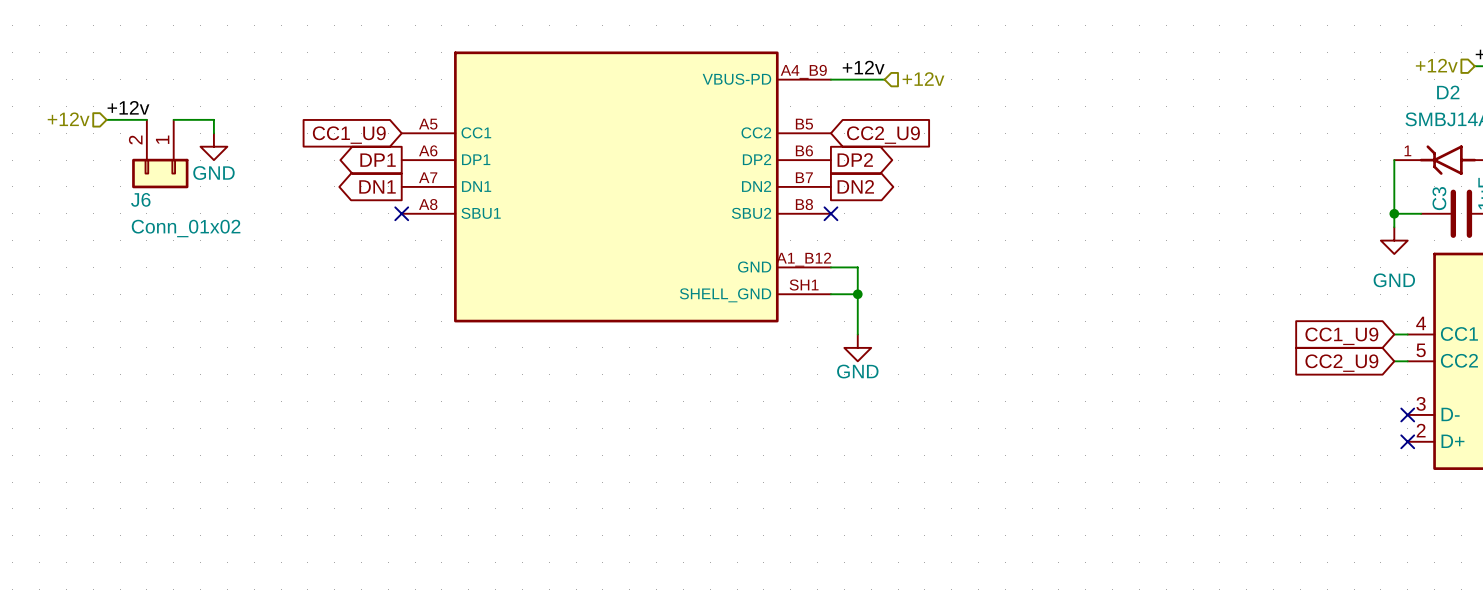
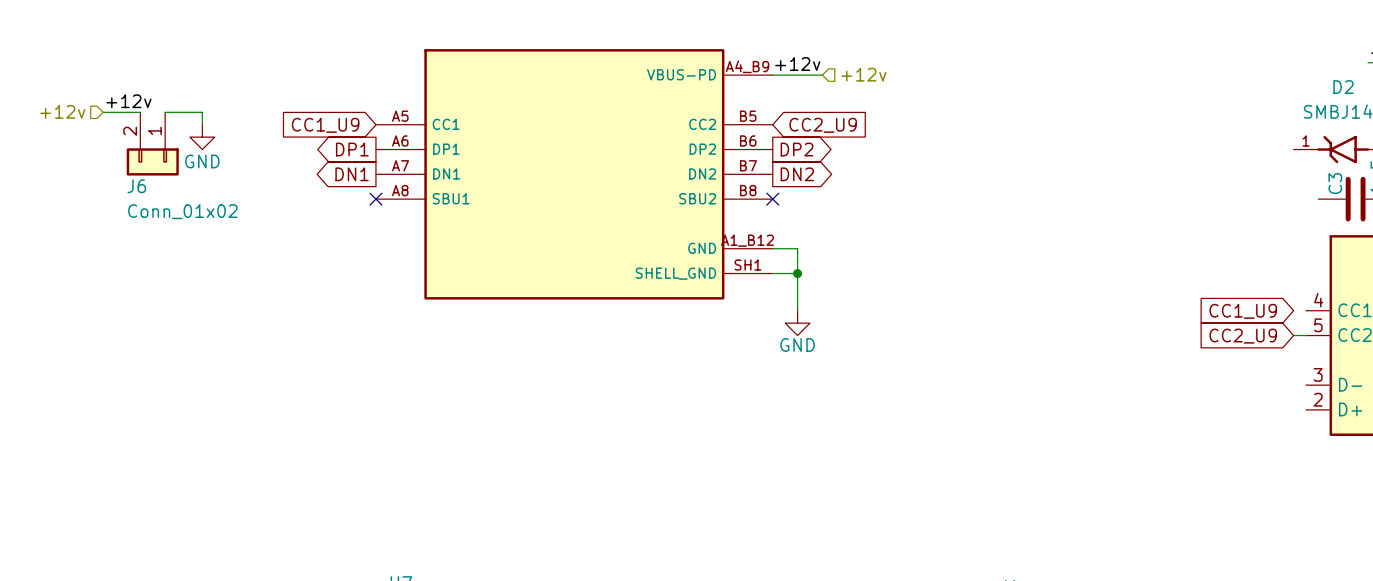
hierarchical label: +12v (1436, 65) -> none
wire: (1394, 160) (1394, 227) -> none
wire: (1394, 213) (1421, 213) -> none
junction: (1394, 213) -> none
power symbol: GND (1394, 240) -> none
wire: (1394, 334) (1407, 334) -> none
no-connect mark: (1407, 414) -> none
no-connect mark: (1407, 441) -> none

